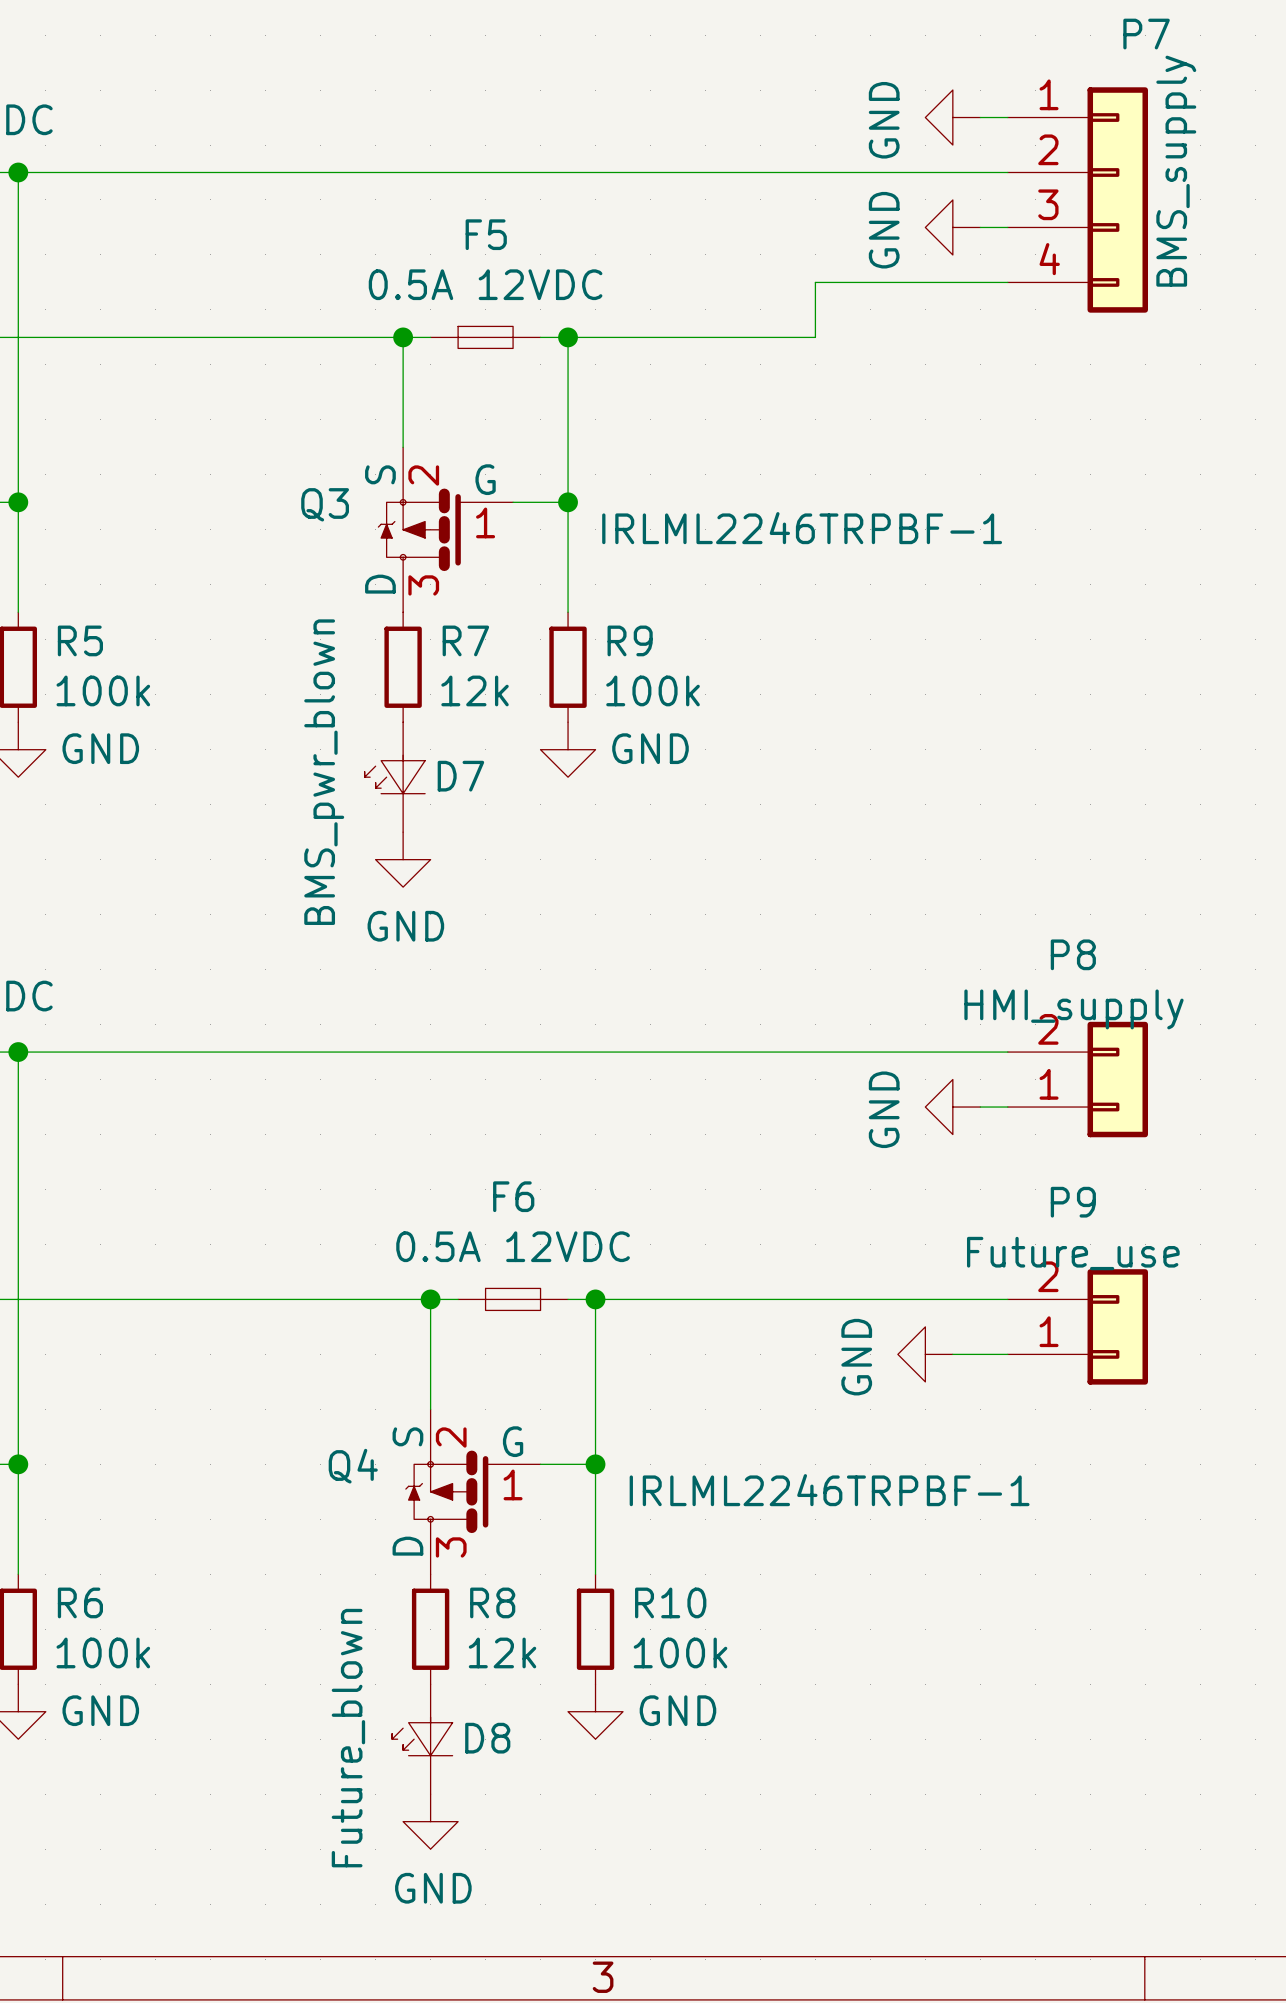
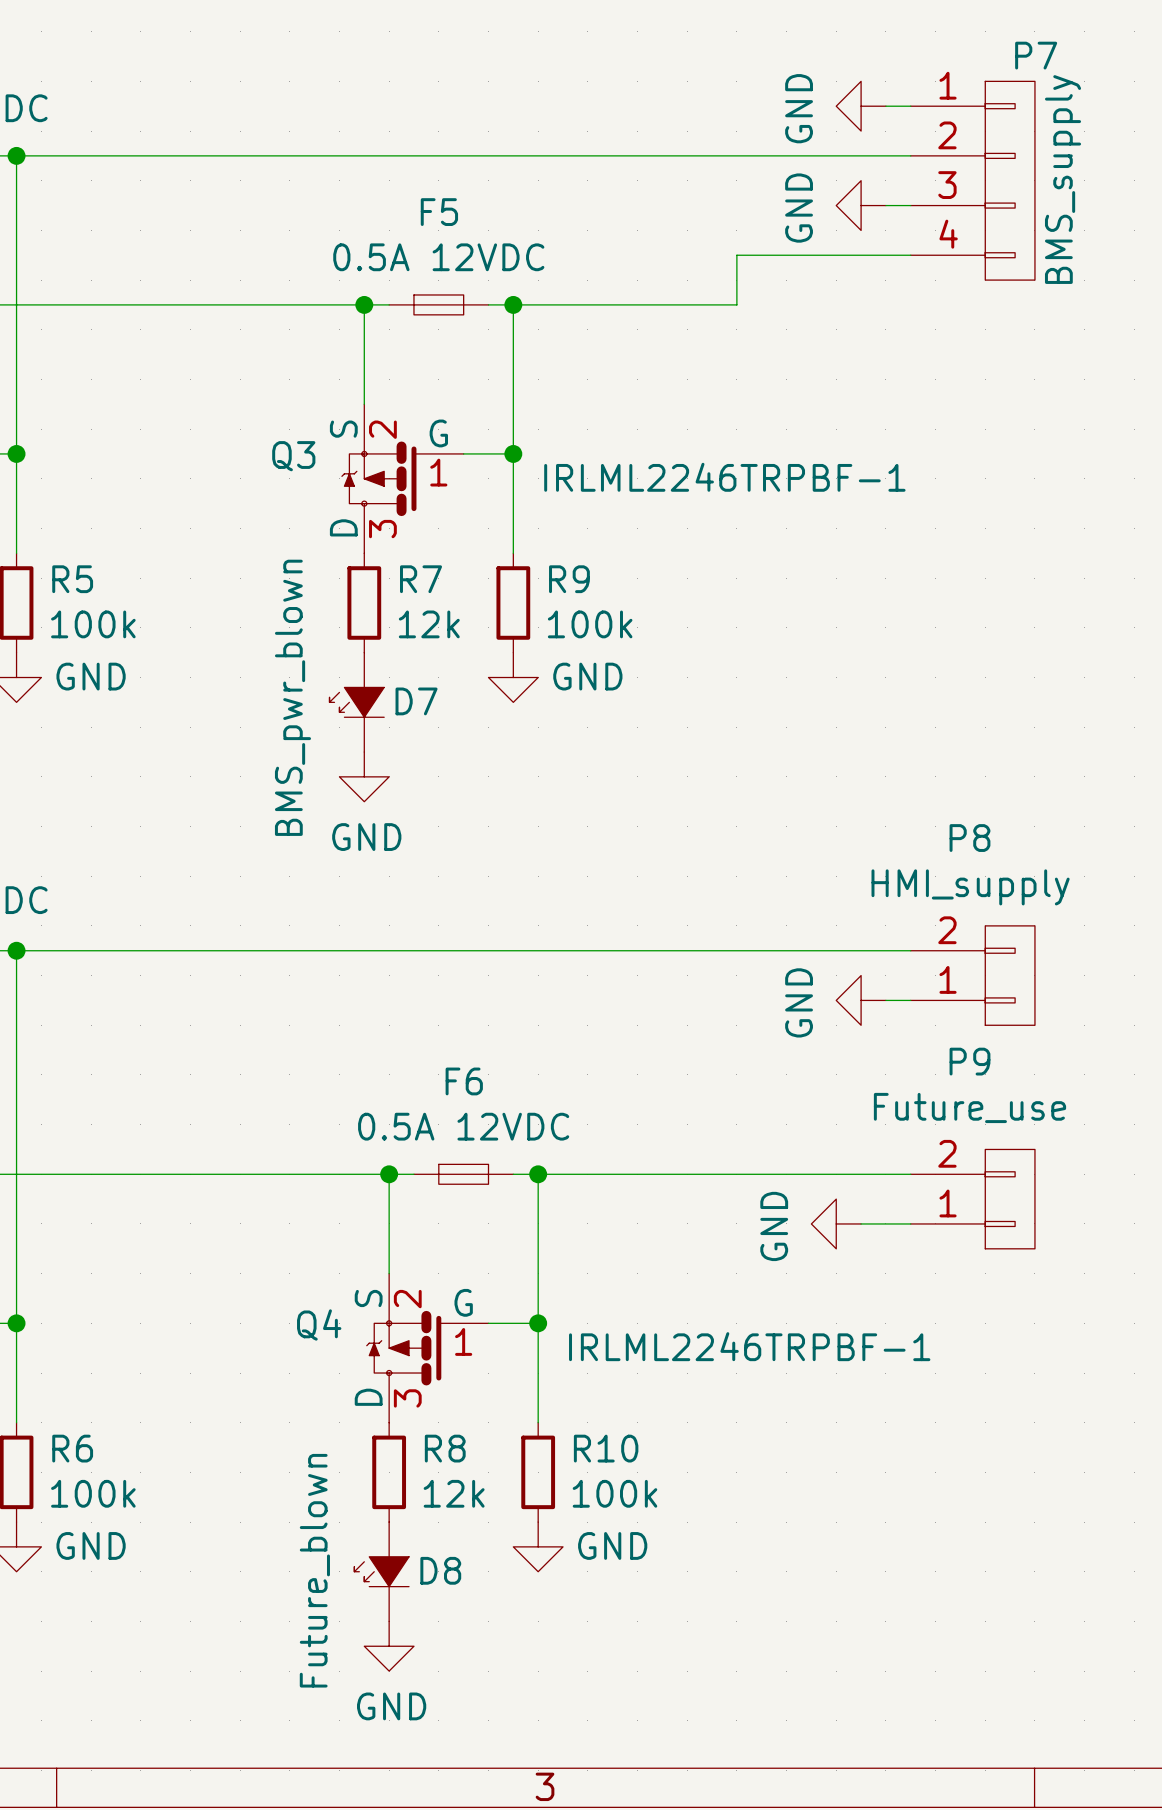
P7 symbol: [1007, 87, 1148, 313] -> [910, 81, 1035, 281]
D7 symbol: [364, 722, 426, 833] -> [329, 652, 385, 753]
P8 symbol: [1007, 1021, 1148, 1138] -> [910, 925, 1035, 1026]
P9 symbol: [1007, 1269, 1148, 1385] -> [910, 1149, 1035, 1249]
D8 symbol: [392, 1684, 453, 1795] -> [354, 1522, 410, 1622]

